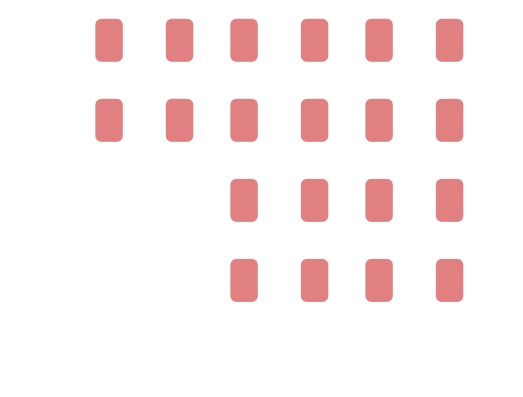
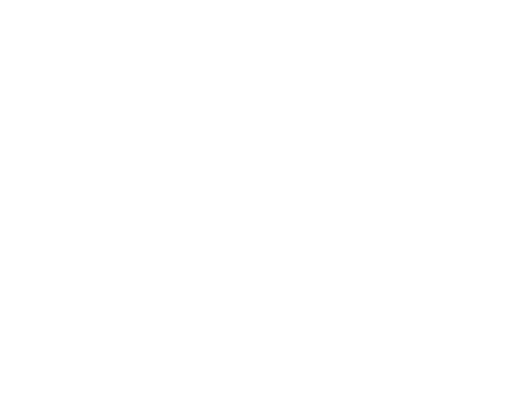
part: (144, 40) -> none
part: (279, 40) -> none
part: (414, 40) -> none
part: (144, 120) -> none
part: (279, 120) -> none
part: (414, 120) -> none
part: (279, 200) -> none
part: (414, 200) -> none
part: (279, 280) -> none
part: (414, 280) -> none

